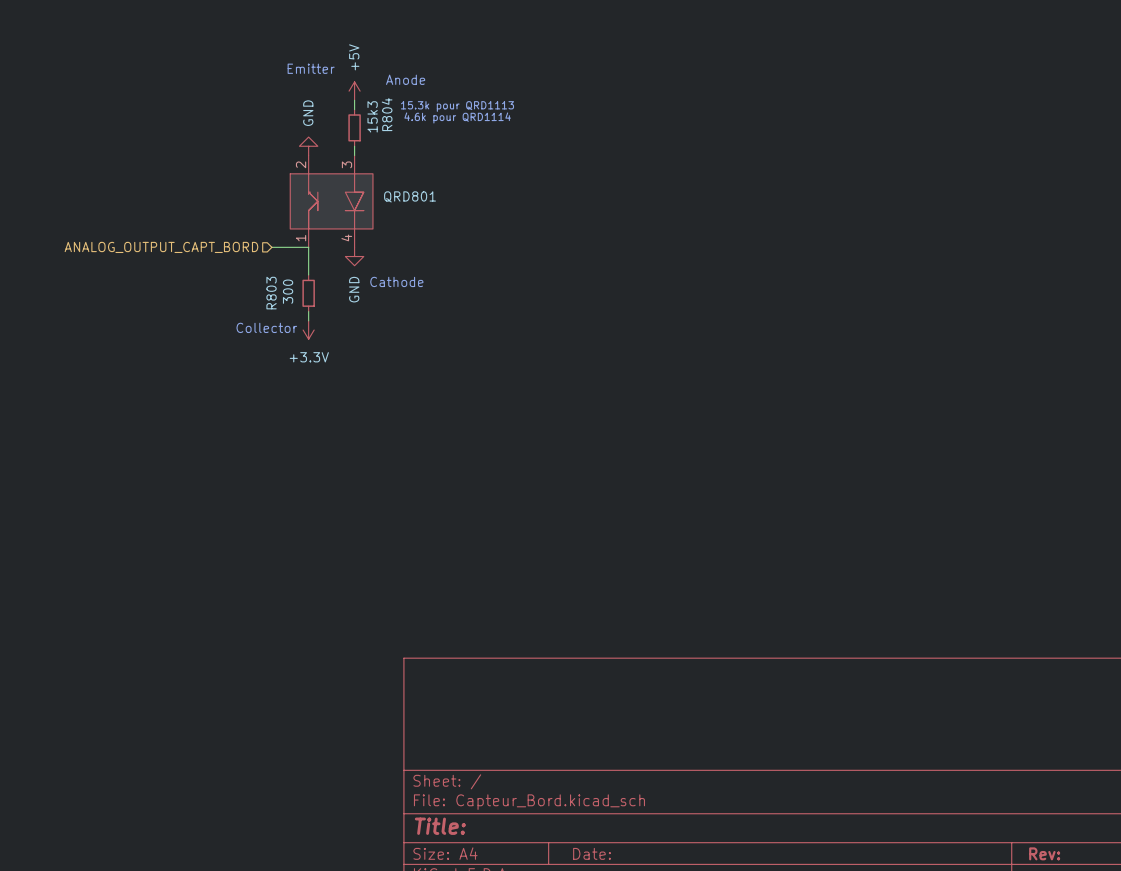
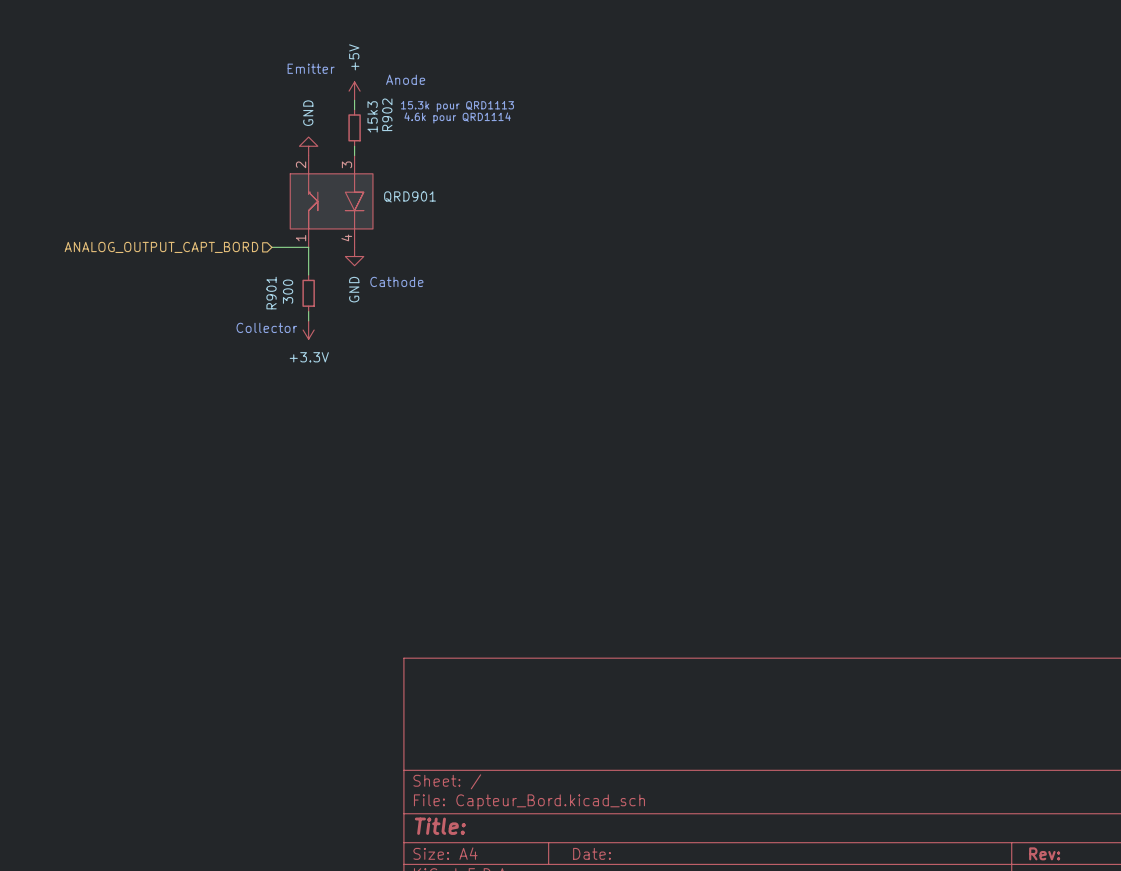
R804 name: R804 (387, 114) -> R902 (387, 114)
QRD801 name: QRD801 (410, 196) -> QRD901 (410, 196)
R803 name: R803 (271, 293) -> R901 (271, 293)

